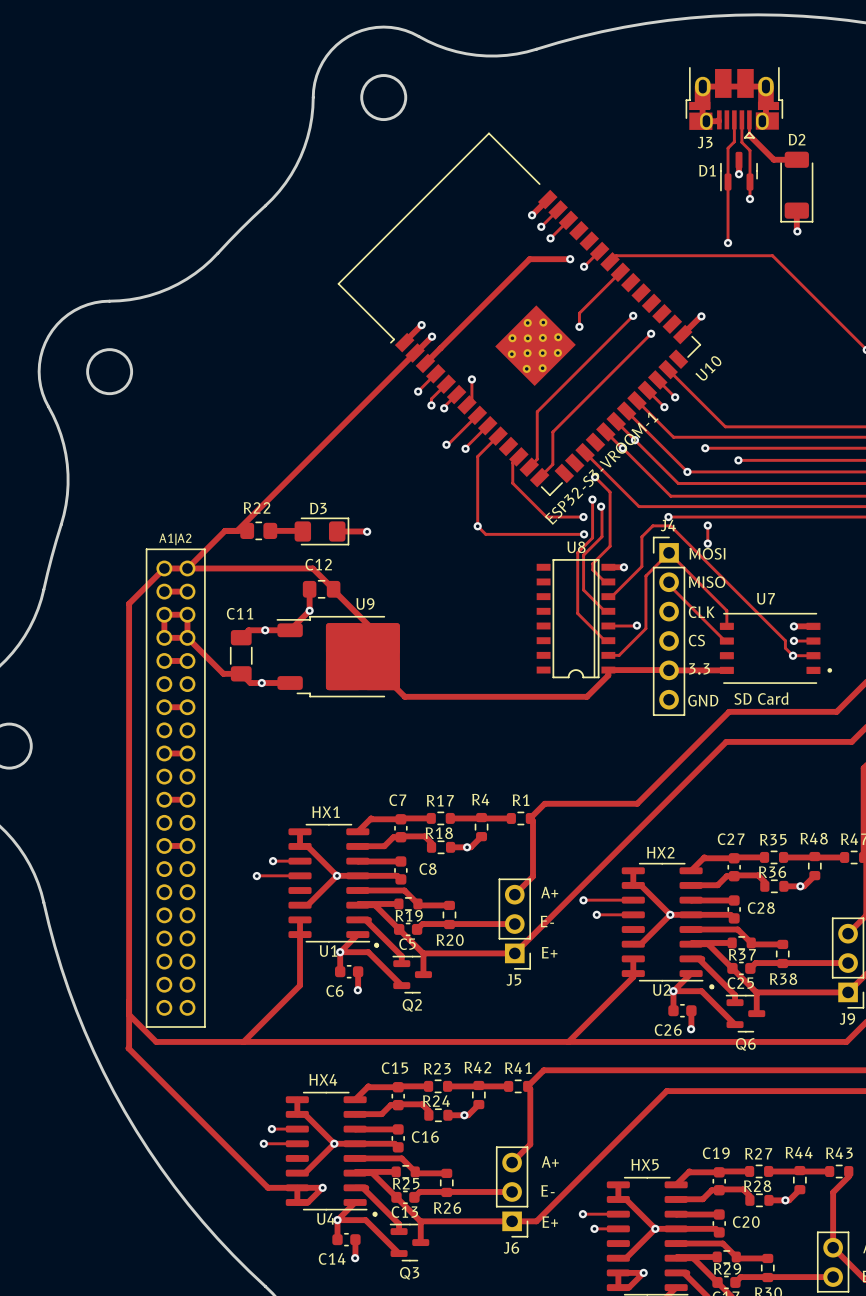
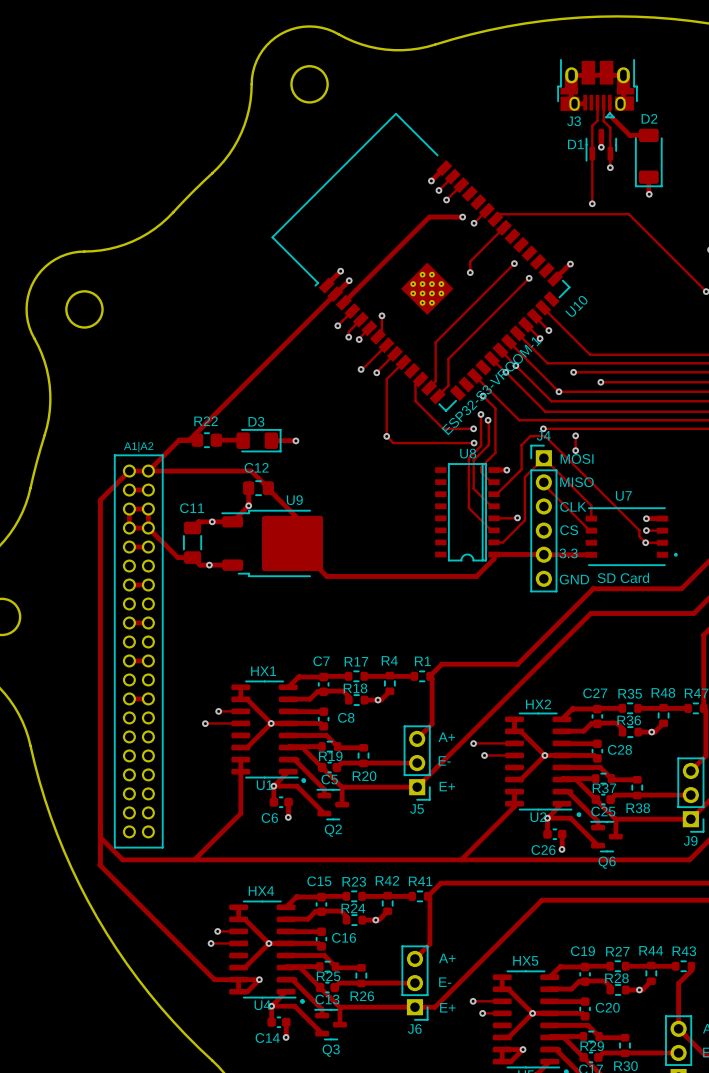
U10 footprint: [337, 132, 702, 496] -> [271, 113, 571, 412]

